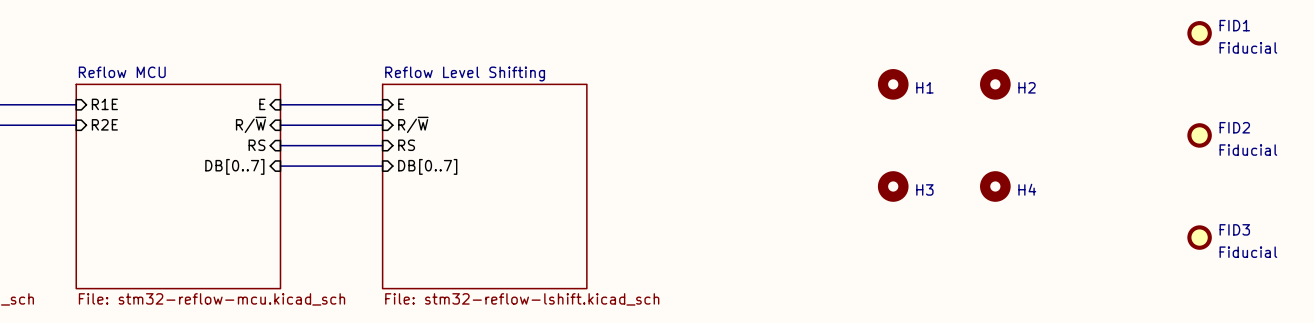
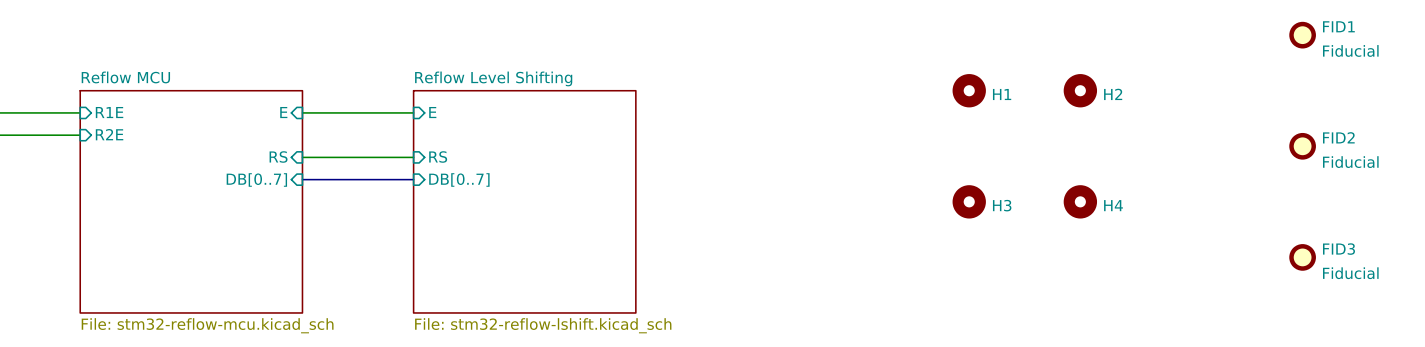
sheet pin: R/~{W} (251, 124) -> none
sheet pin: R/~{W} (413, 124) -> none
wire: (280, 125) (382, 125) -> none

